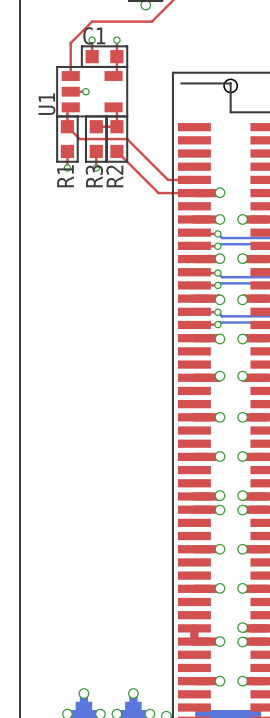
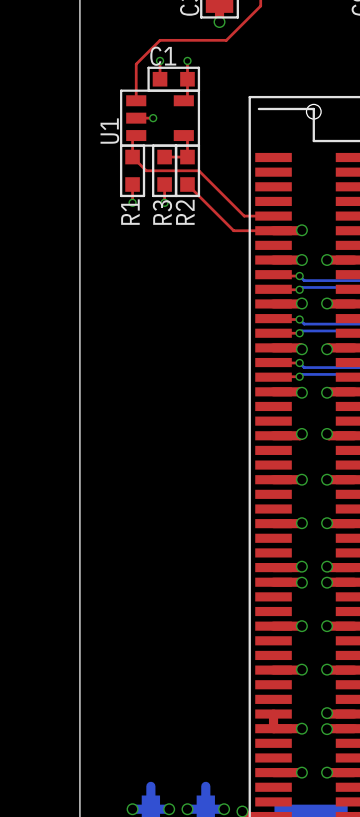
via: (83, 693) -> none
via: (133, 693) -> none

